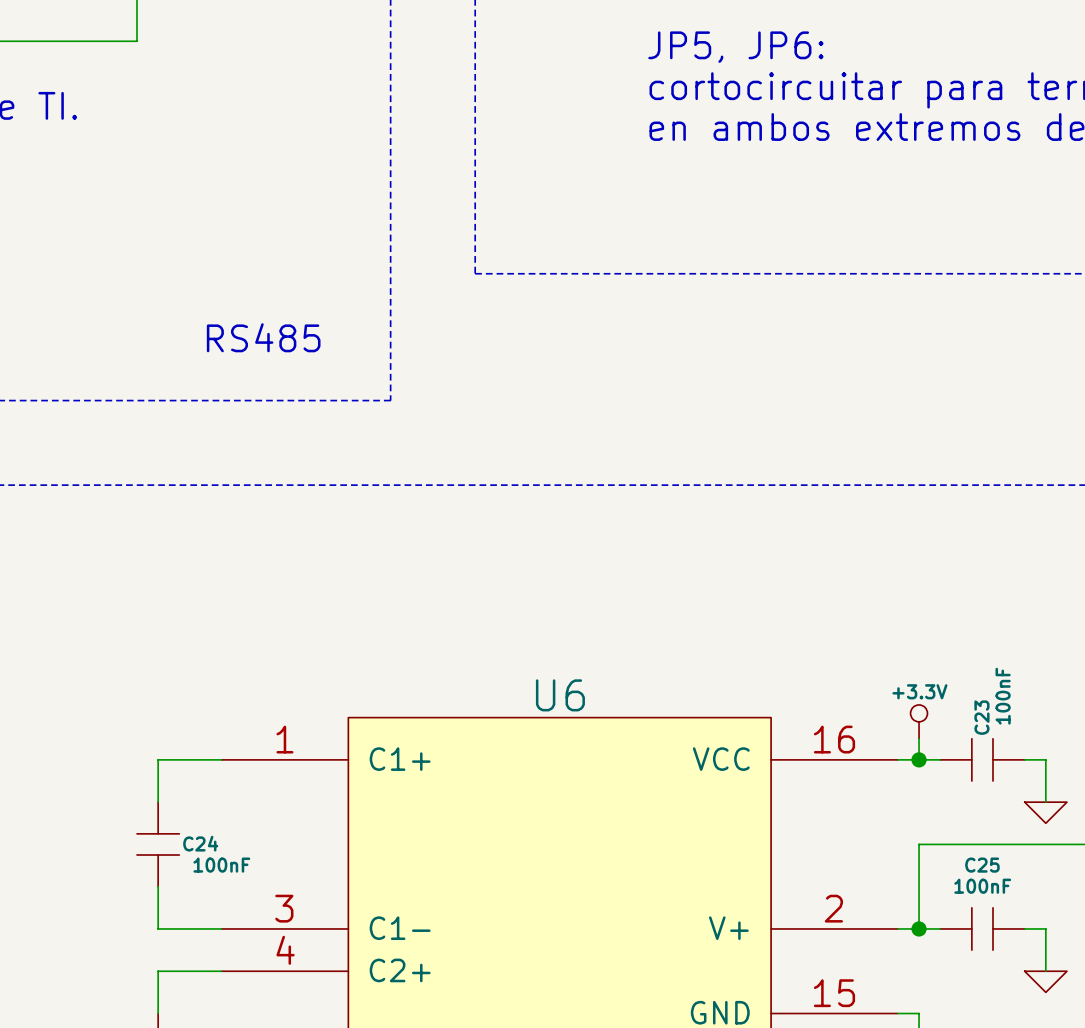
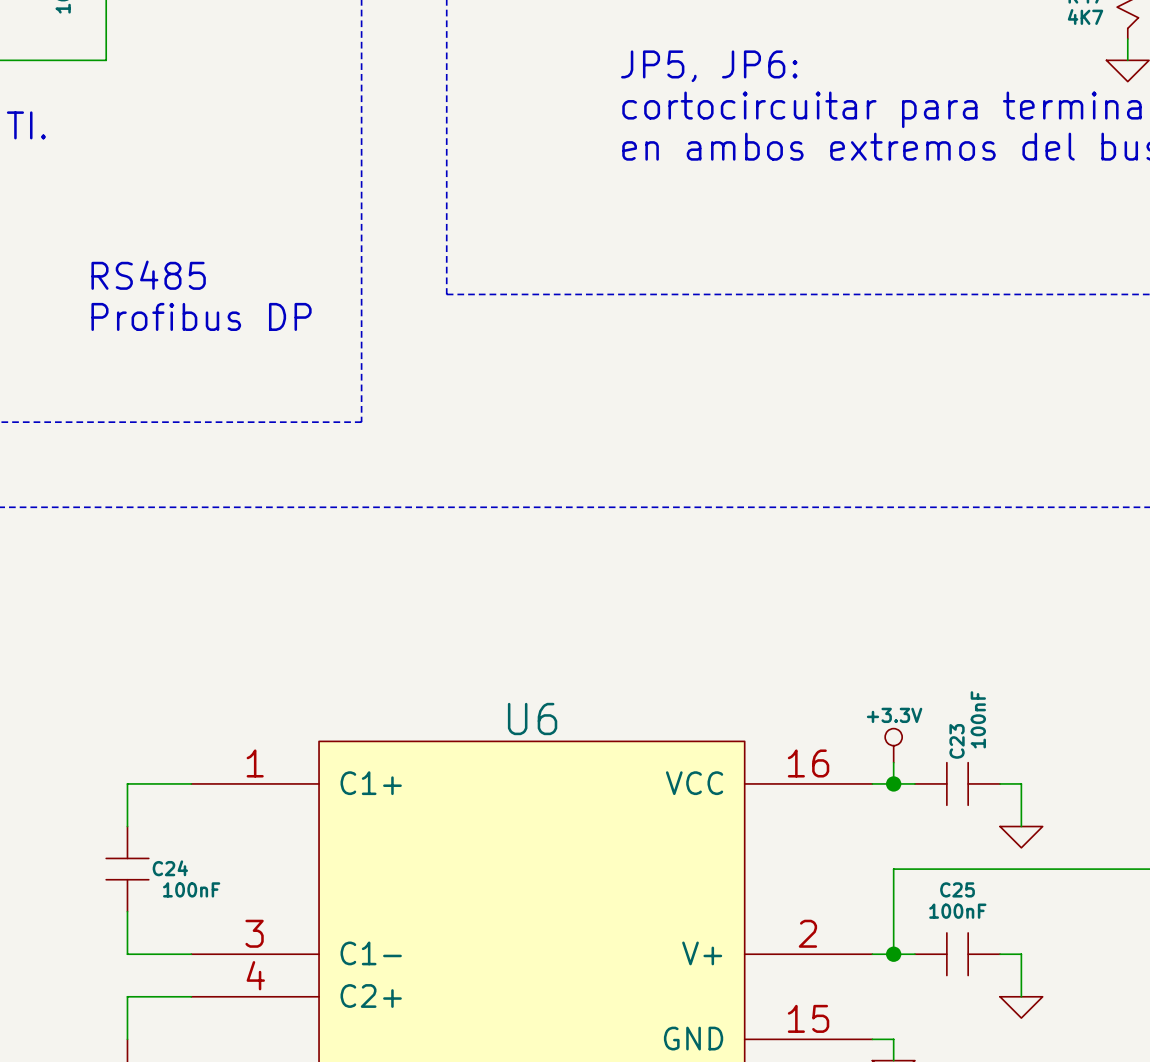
text: none -> Profibus DP (201, 316)
text position: RS485 (263, 337) -> RS485 (148, 275)

